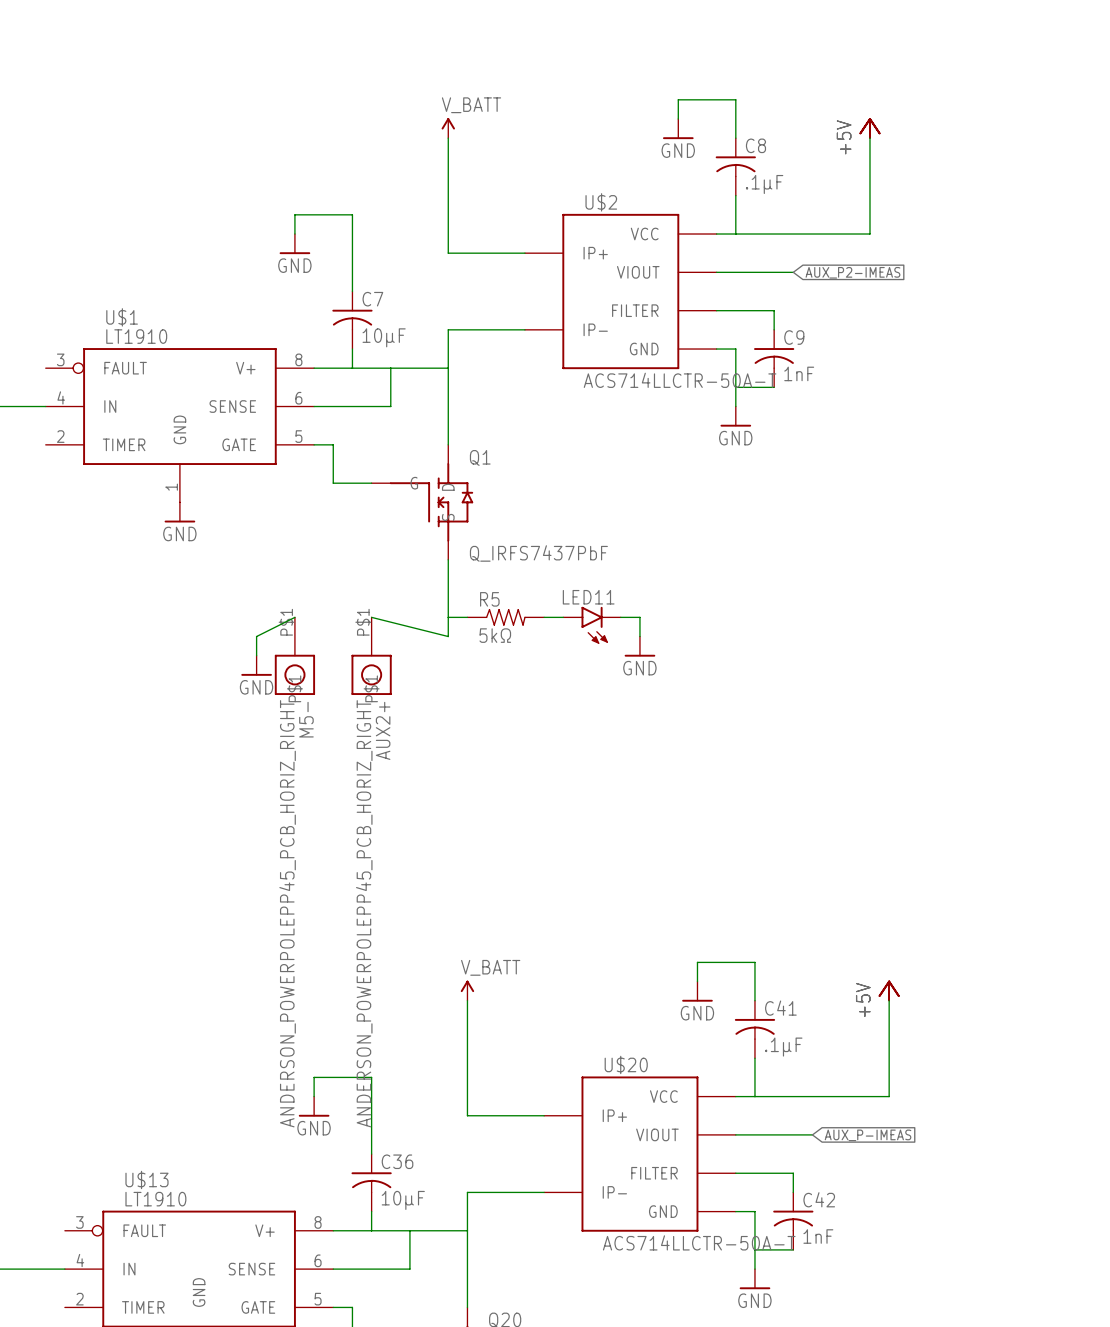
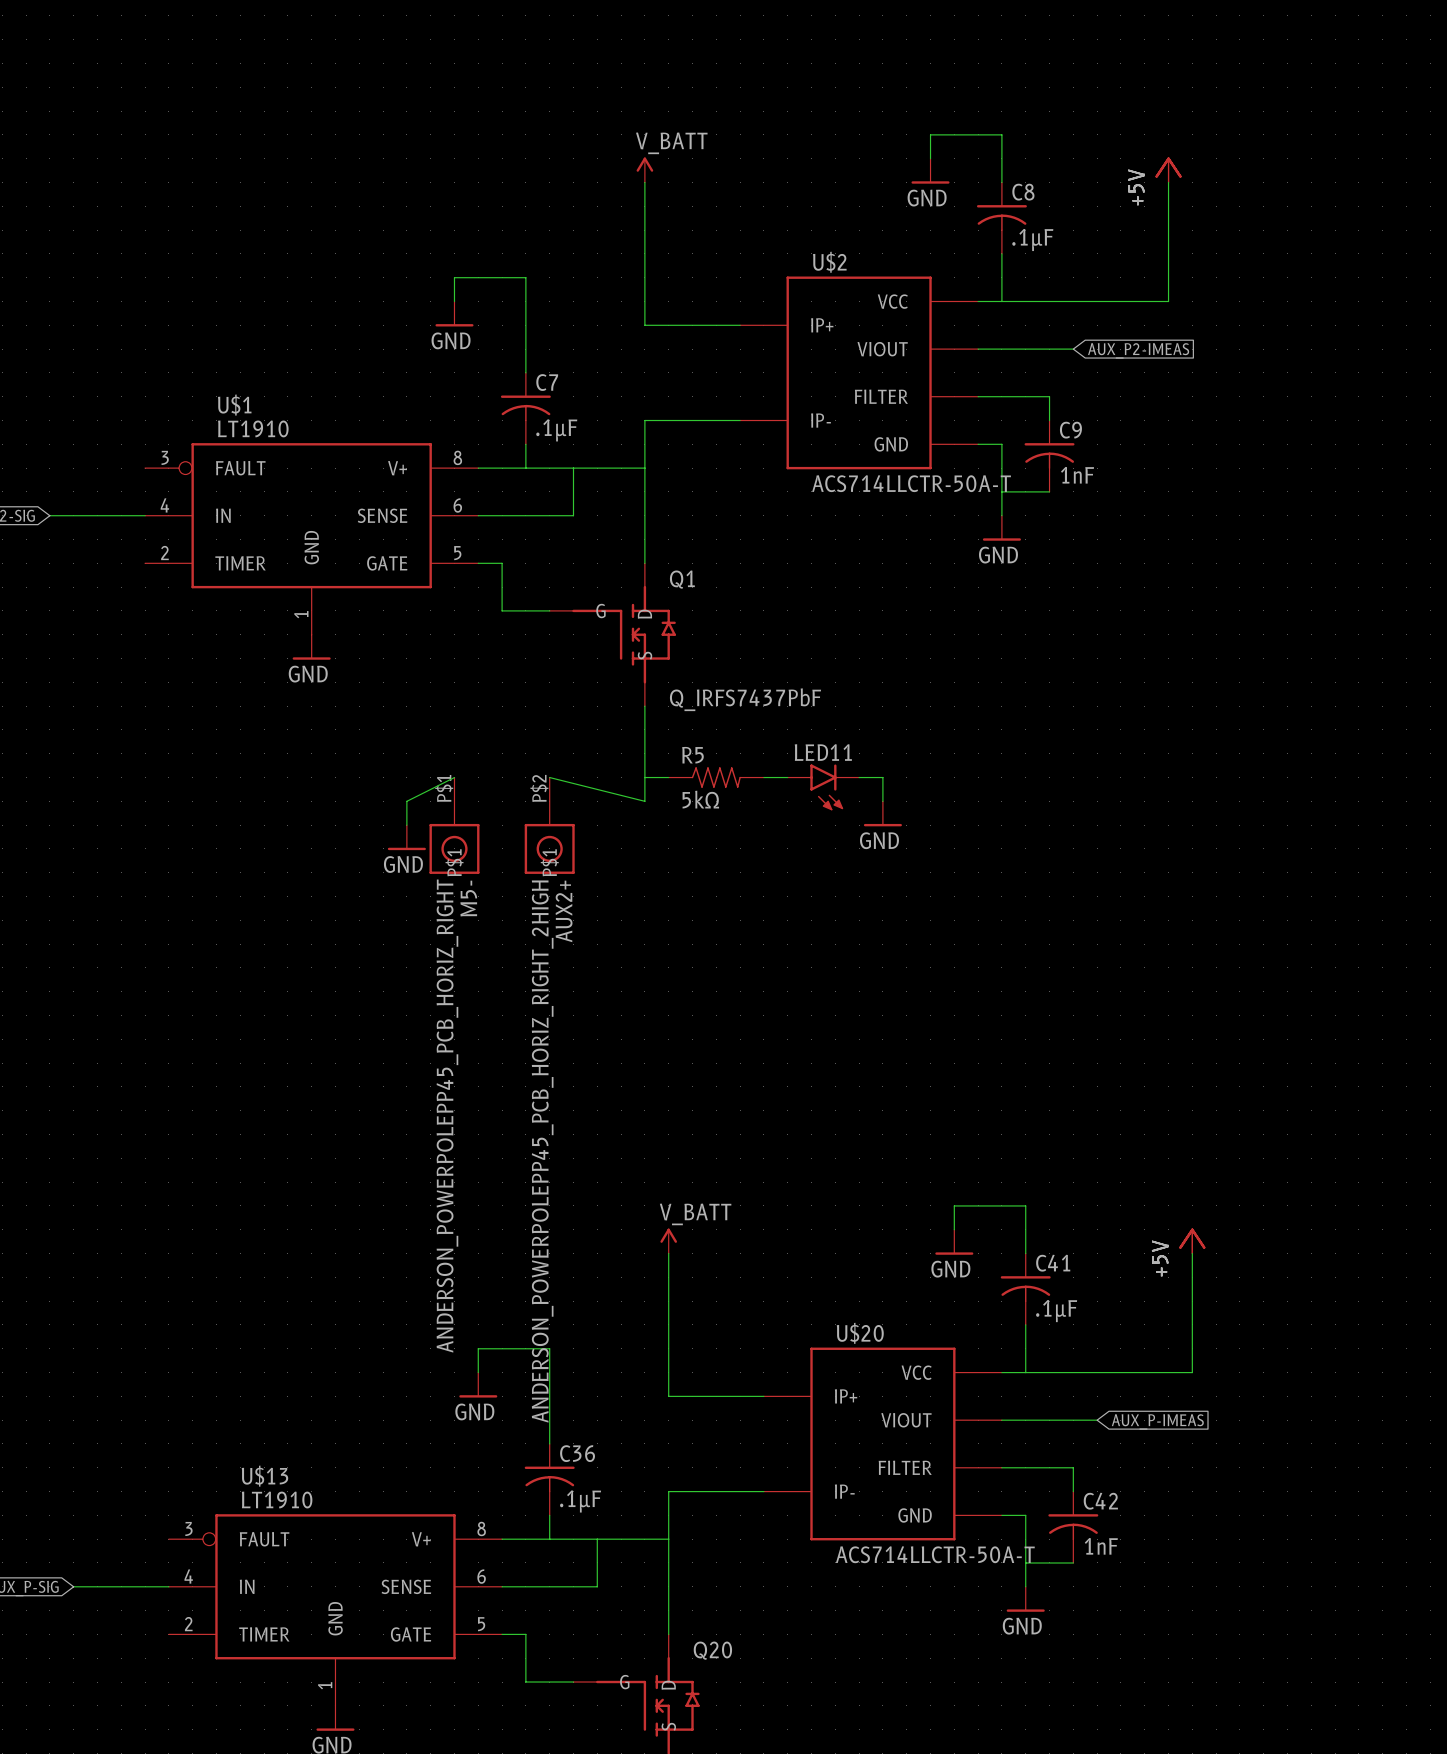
C7 value: 10µF (384, 337) -> .1µF (556, 430)
AUX2+ pin number: P$1 (363, 622) -> P$2 (539, 788)
AUX2+ value: ANDERSON_POWERPOLEPP45_PCB_HORIZ_RIGHT (364, 913) -> ANDERSON_POWERPOLEPP45_PCB_HORIZ_RIGHT_2HIGH (542, 1151)
C36 value: 10µF (403, 1200) -> .1µF (580, 1501)

